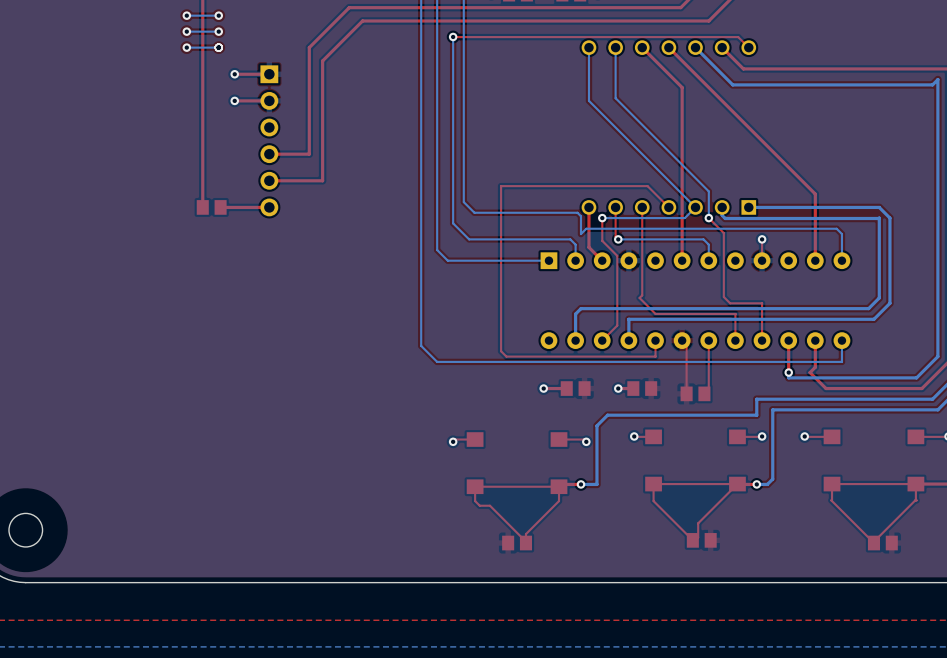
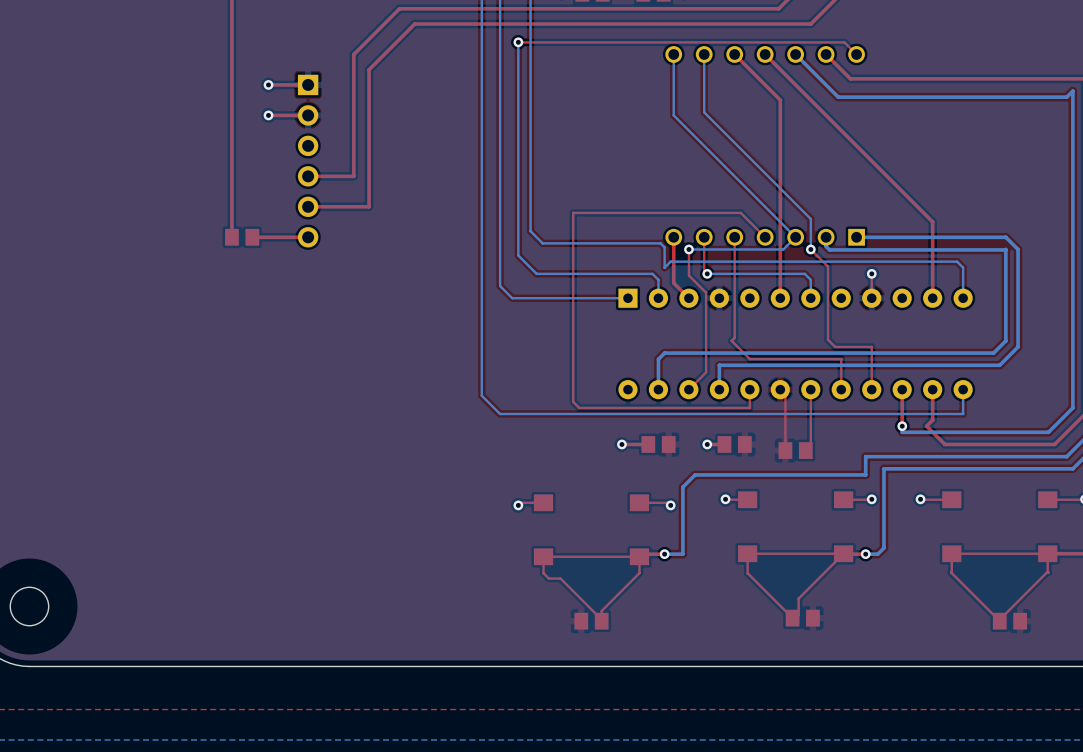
via: (186, 15) -> none
bottom track: (218, 15) (186, 15) -> none
via: (218, 15) -> none
via: (186, 31) -> none
bottom track: (218, 31) (186, 31) -> none
via: (218, 31) -> none
via: (186, 47) -> none
bottom track: (218, 47) (186, 47) -> none
via: (218, 47) -> none

